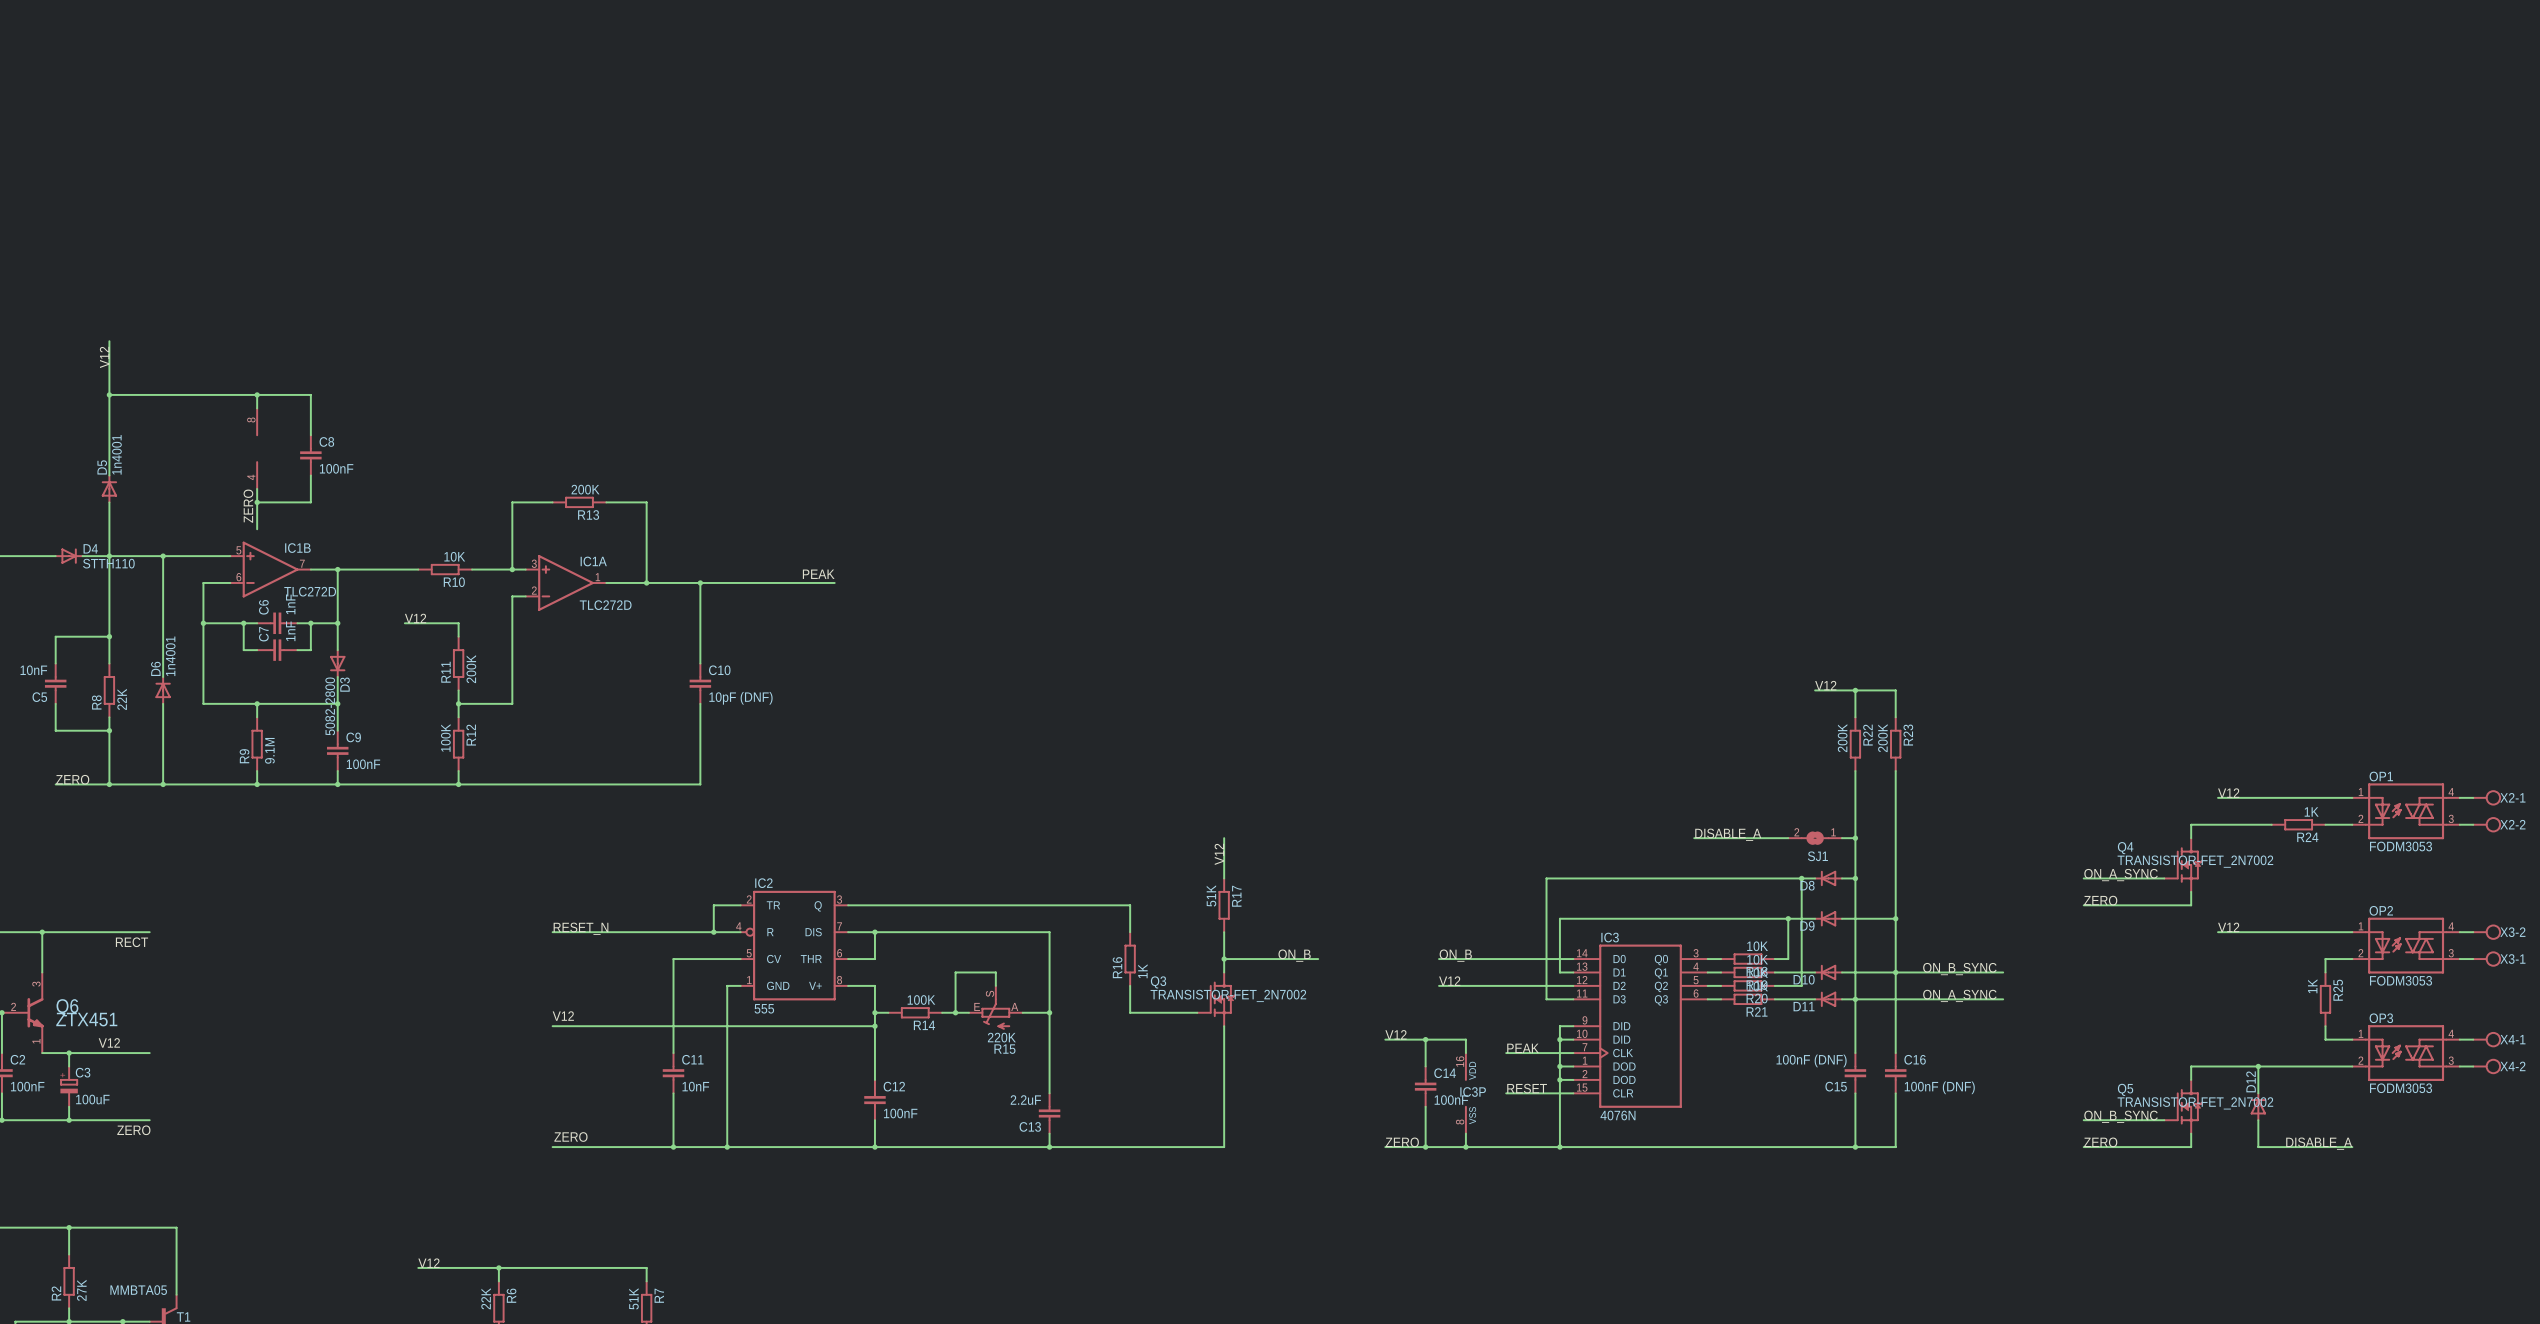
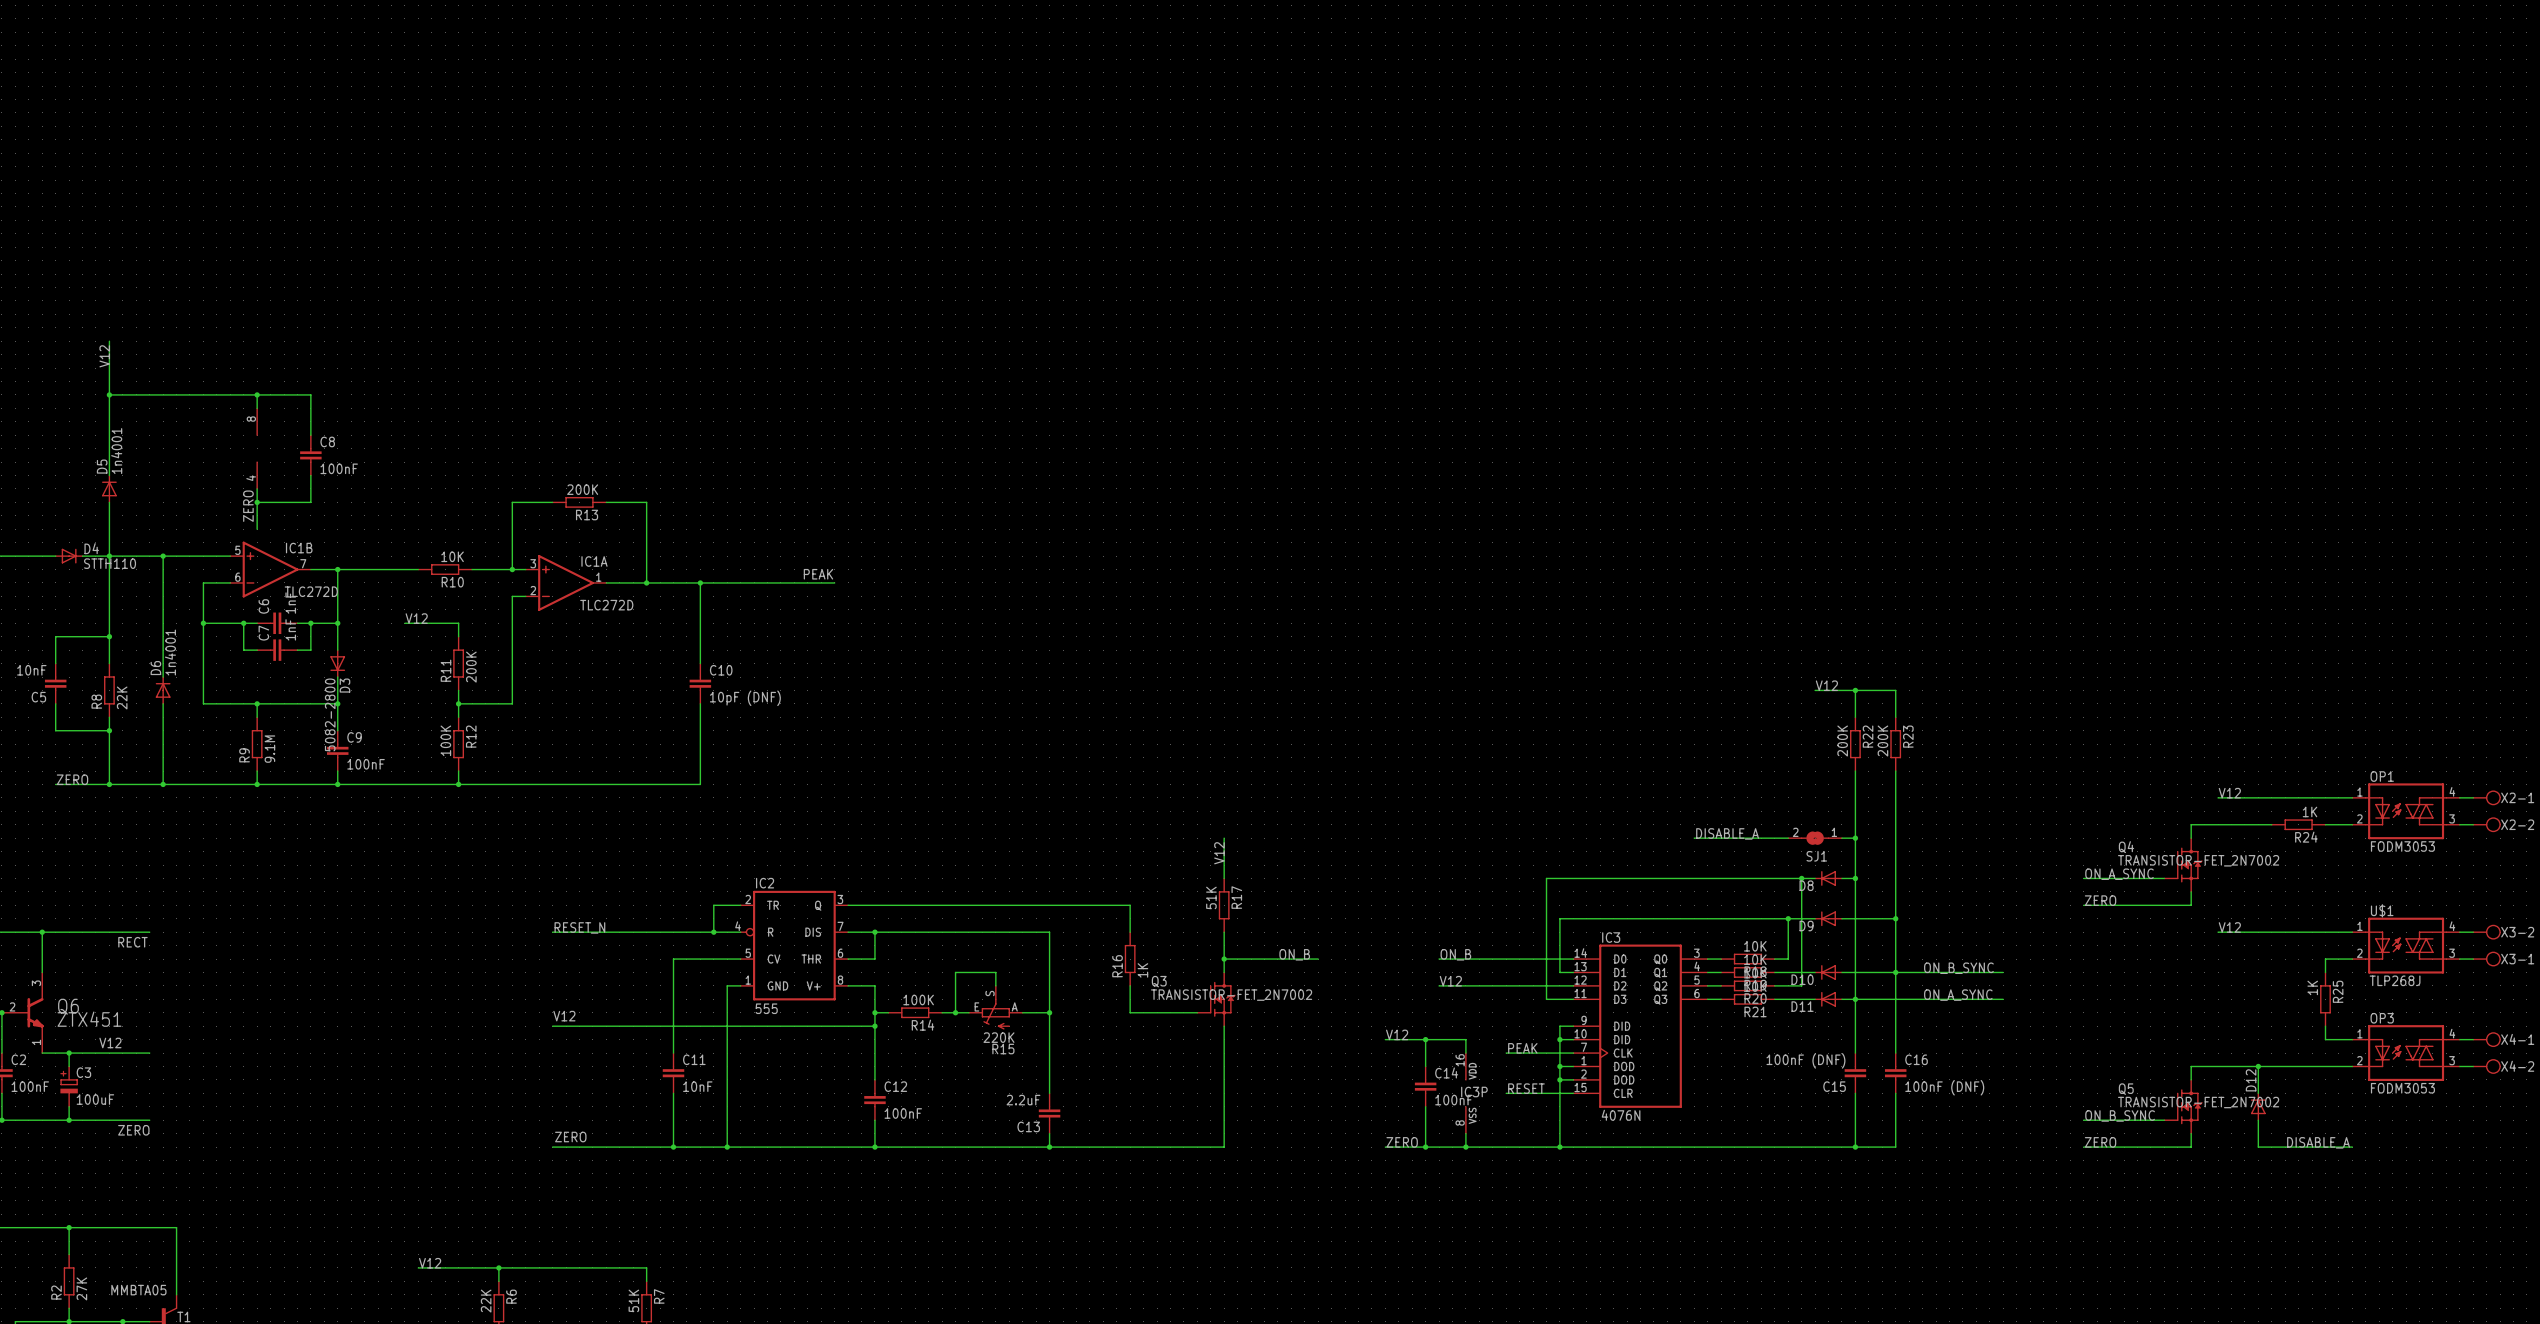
OP2 name: OP2 (2381, 910) -> U$1 (2382, 910)
OP2 value: FODM3053 (2401, 980) -> TLP268J (2395, 980)

